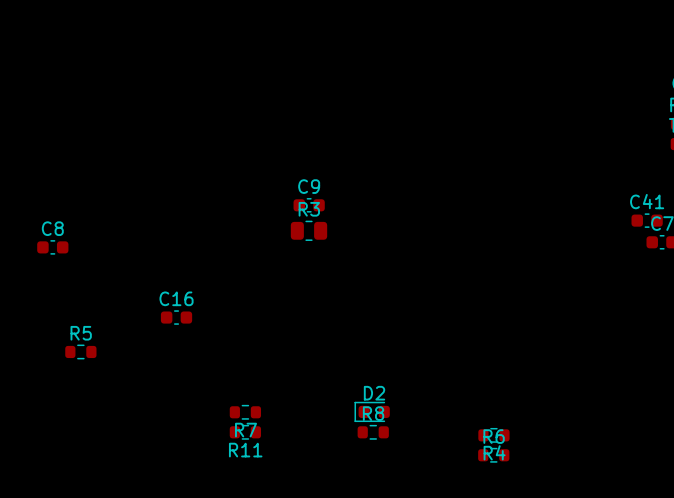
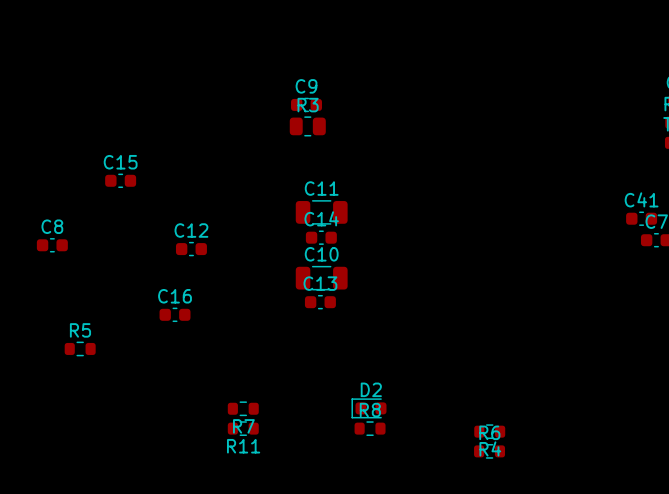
C15: none -> (120, 180)
C9 position: (309, 205) -> (306, 104)
C11: none -> (321, 212)
R3 position: (309, 230) -> (307, 126)
C14: none -> (321, 237)
C12: none -> (191, 249)
C10: none -> (321, 278)
C13: none -> (320, 302)

